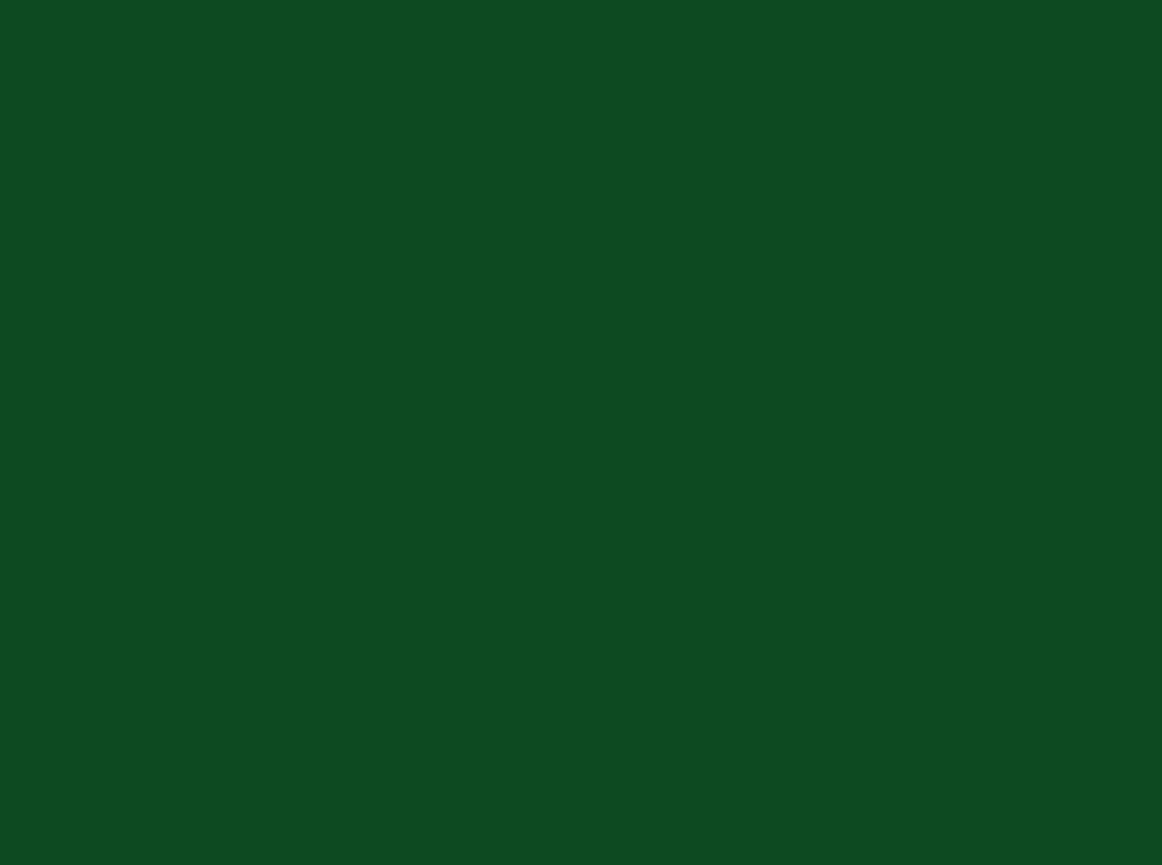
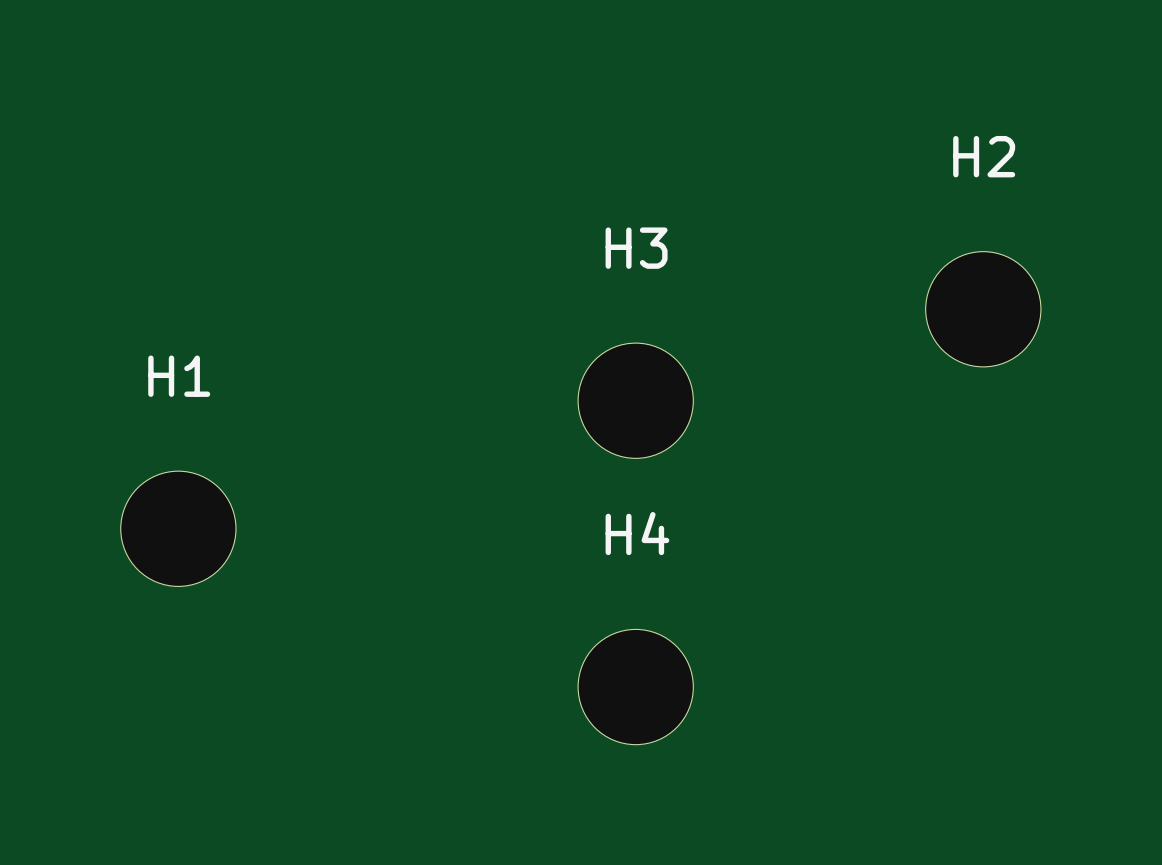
H2: none -> (983, 309)
H3: none -> (635, 400)
H1: none -> (178, 528)
H4: none -> (635, 687)

